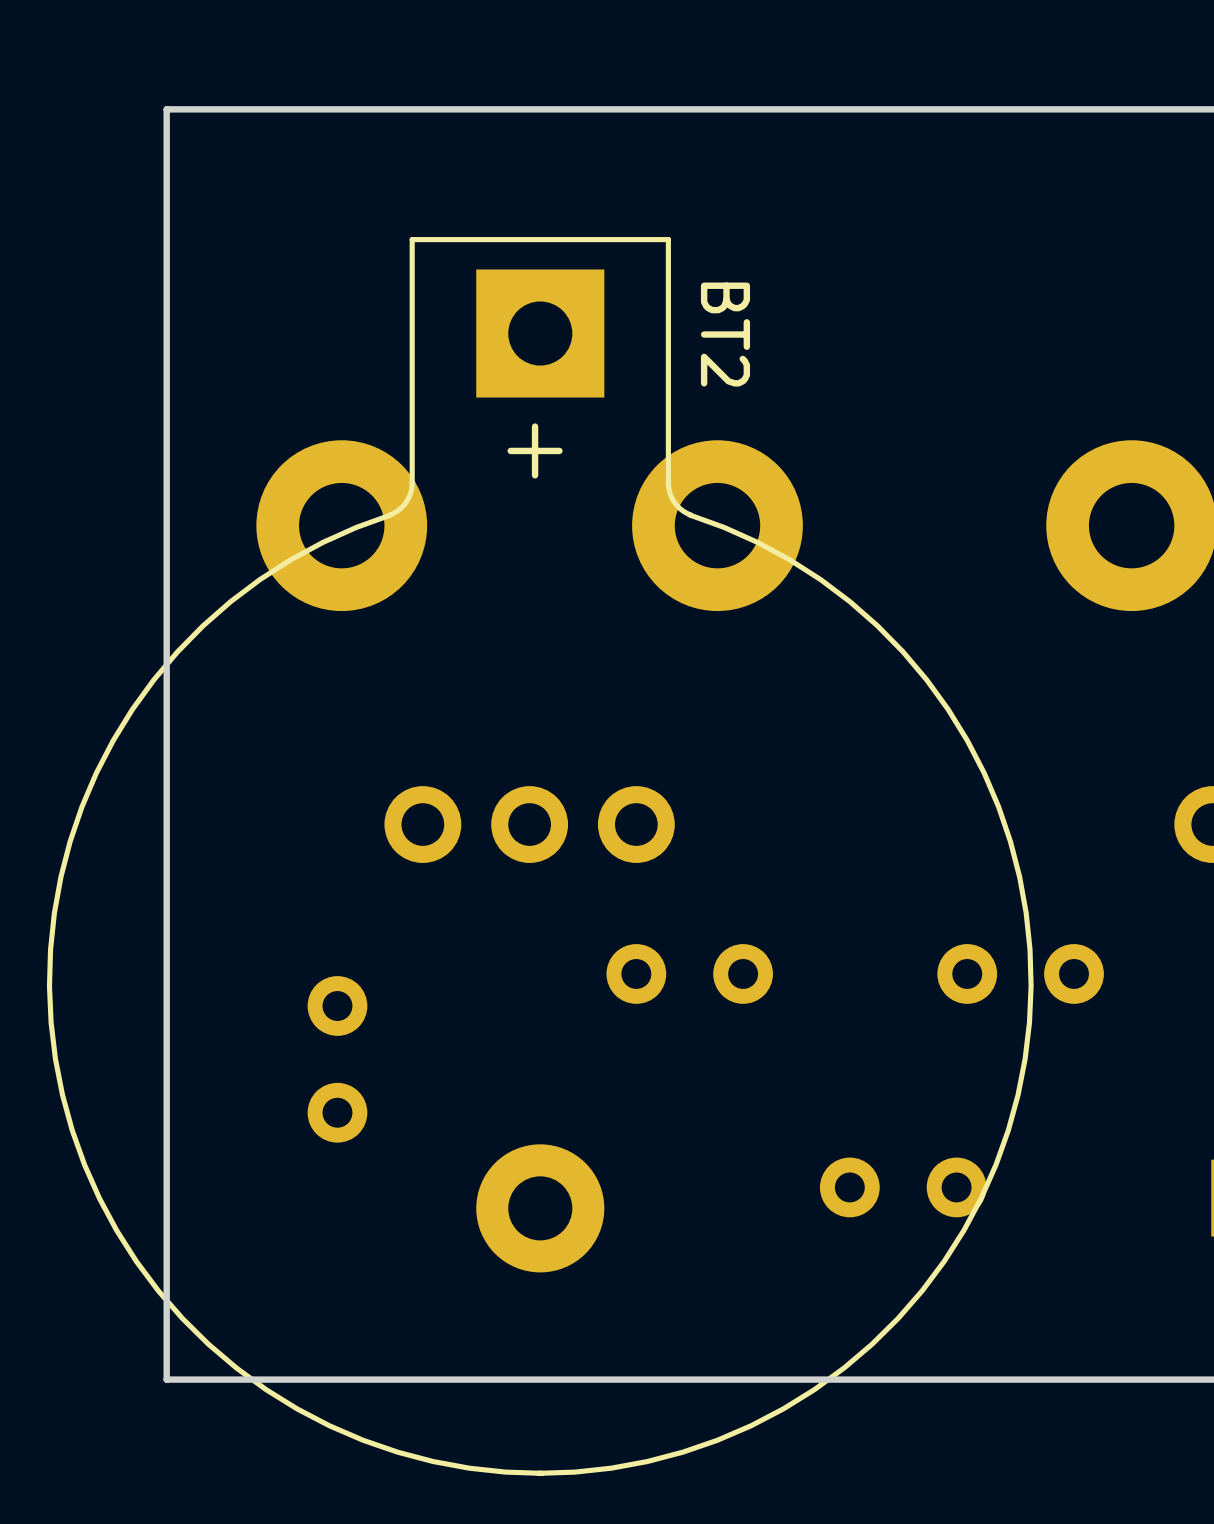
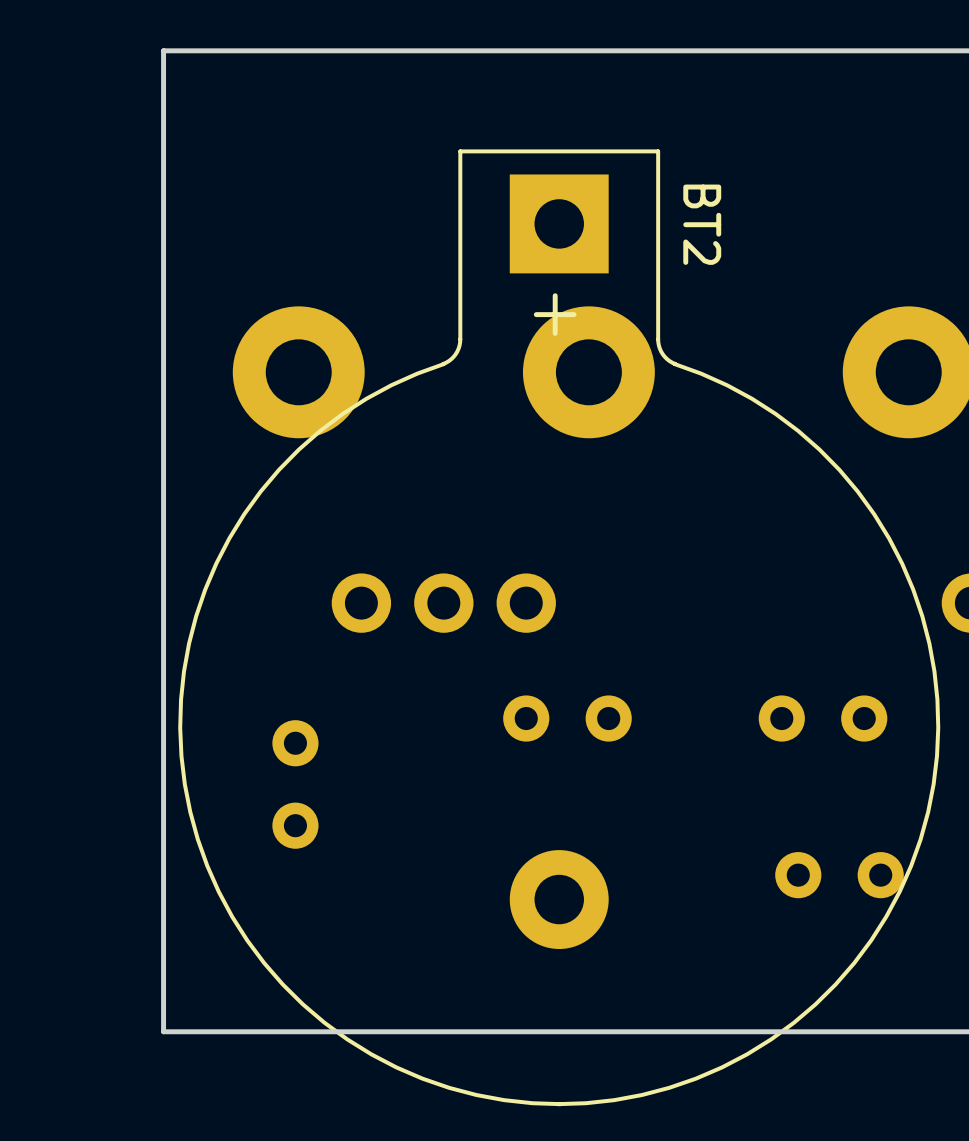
BT2 position: (540, 856) -> (559, 627)
part position: (903, 1187) -> (839, 875)

